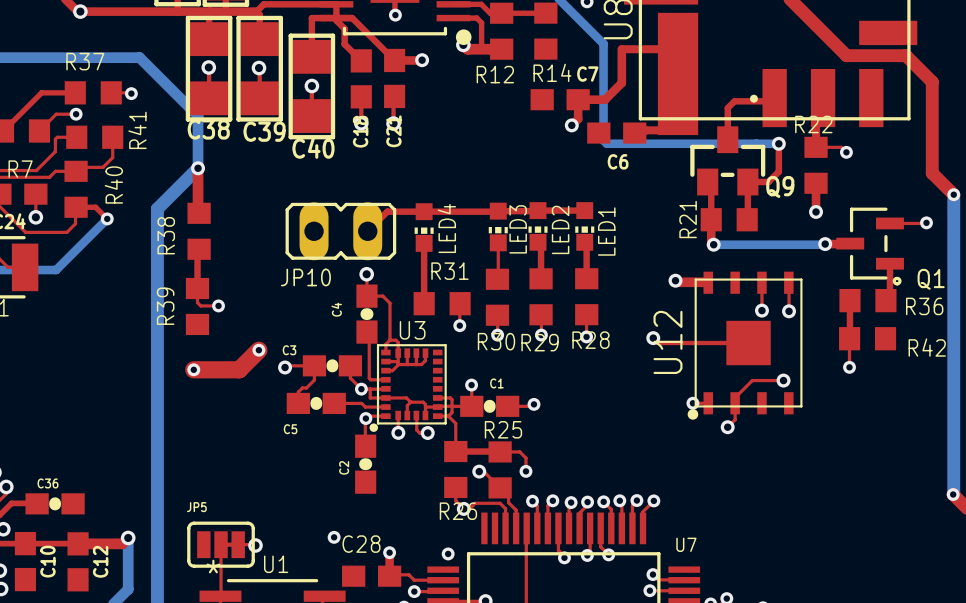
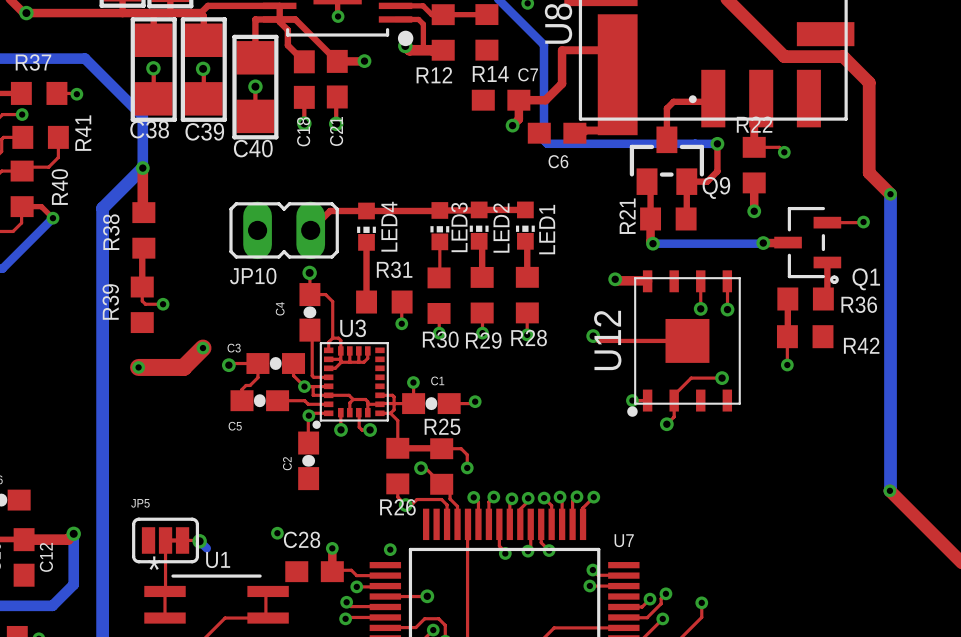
bottom track: none -> (199, 541) (206, 548)

